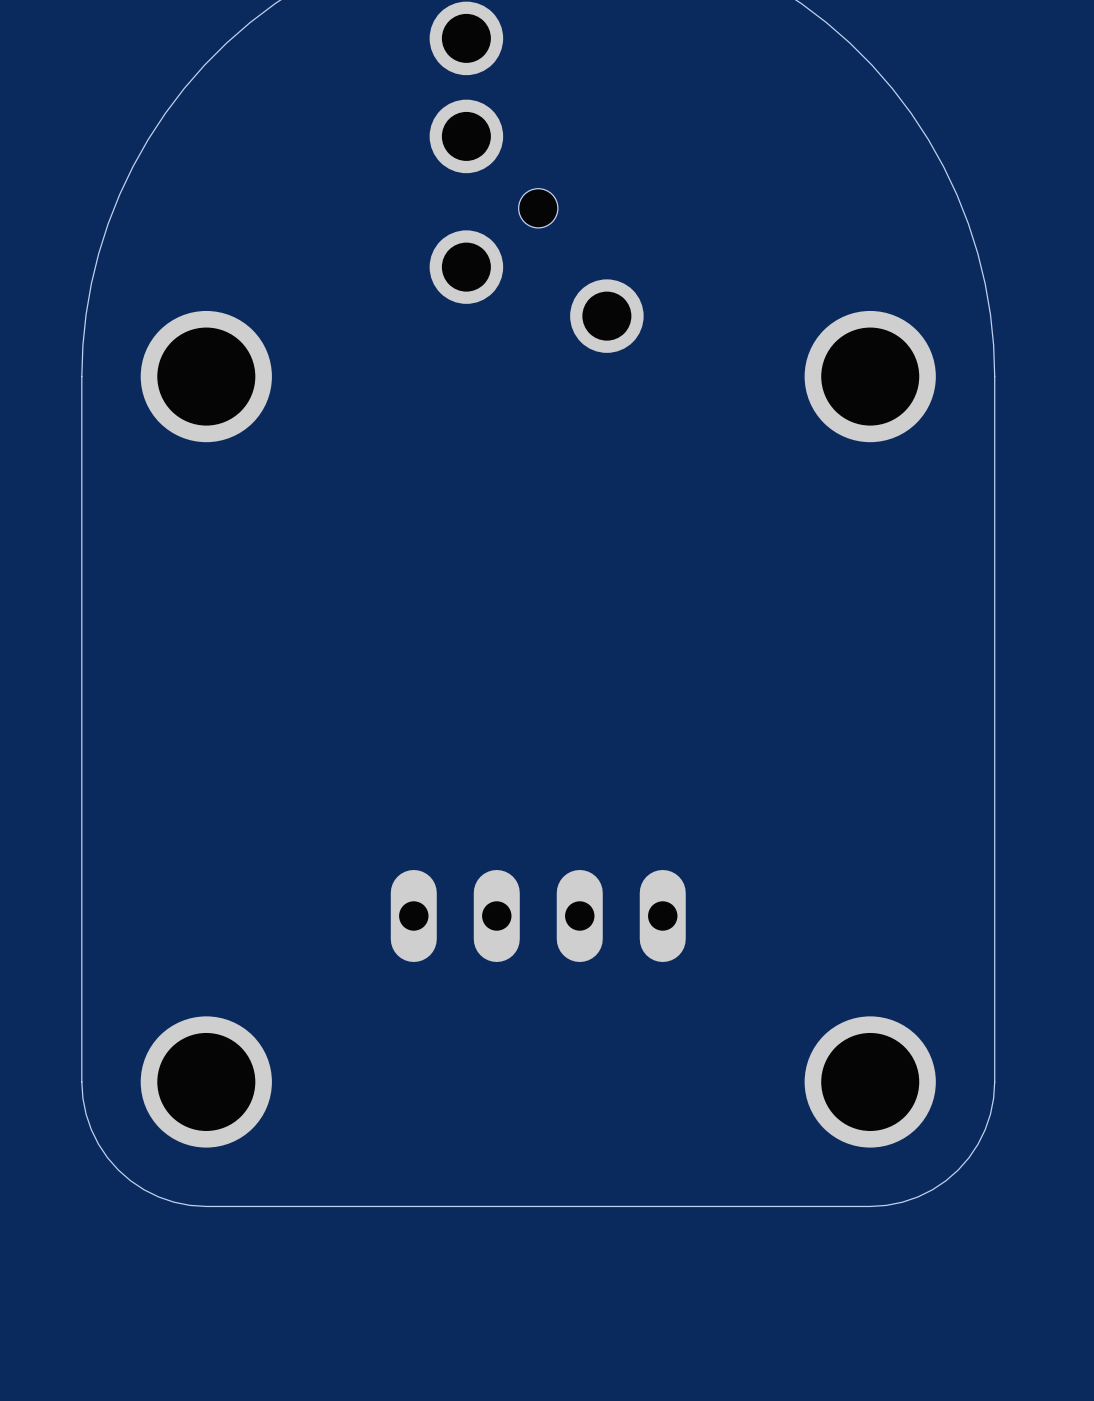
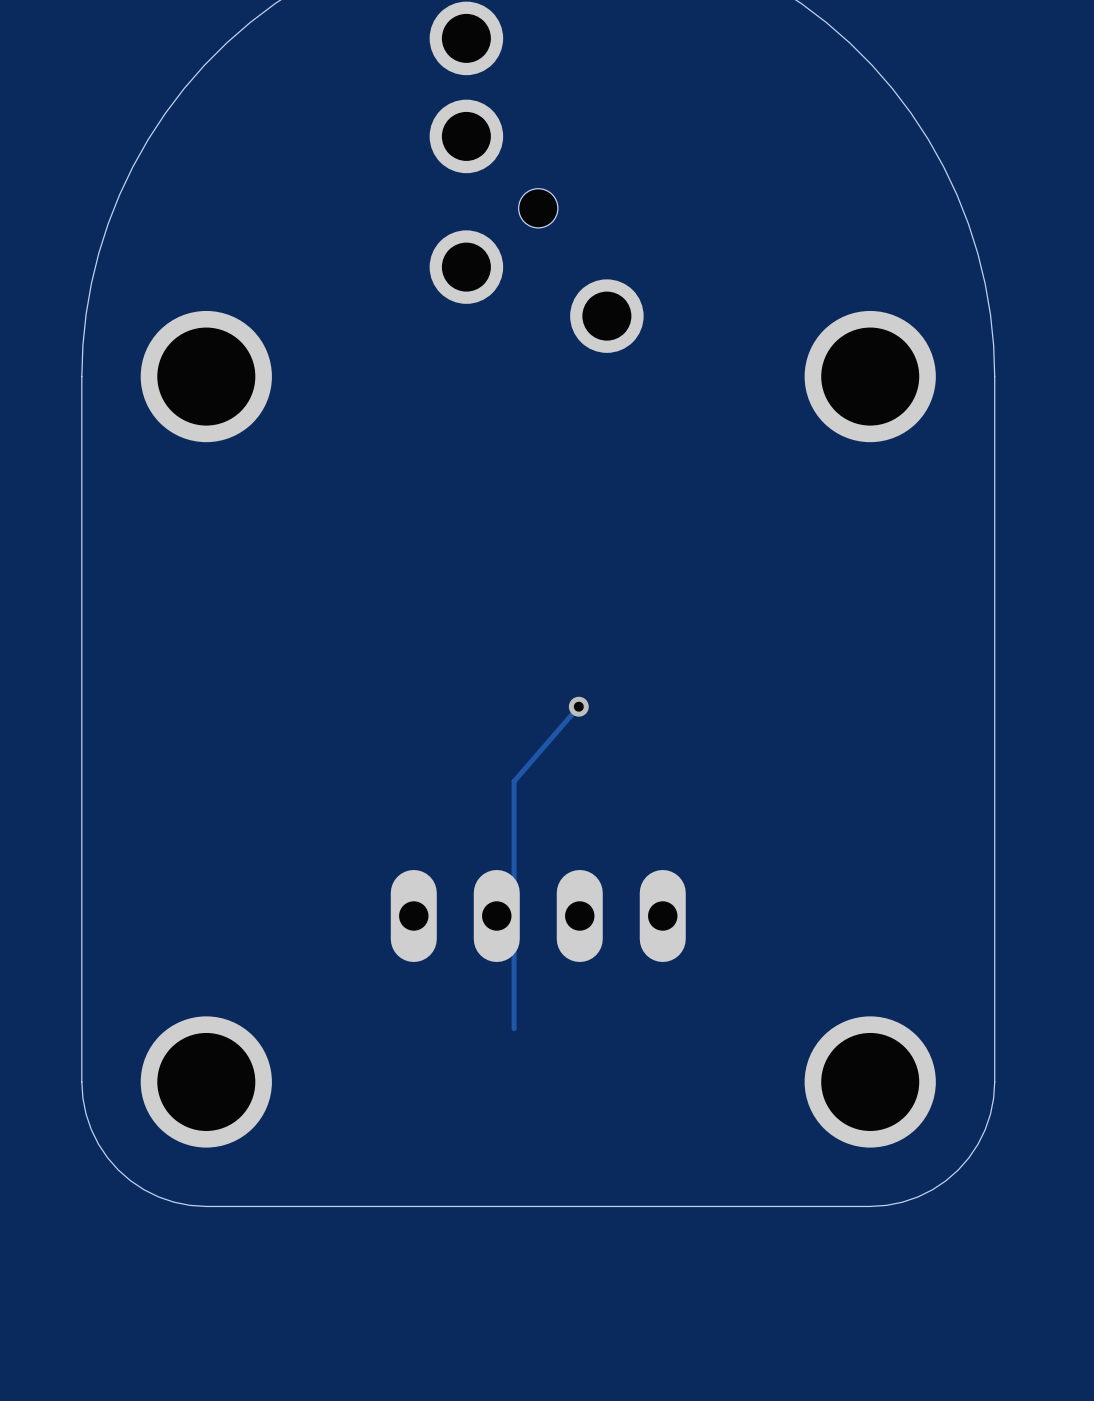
track: none -> (578, 706) (514, 781) (514, 1028)
via: none -> (578, 706)

